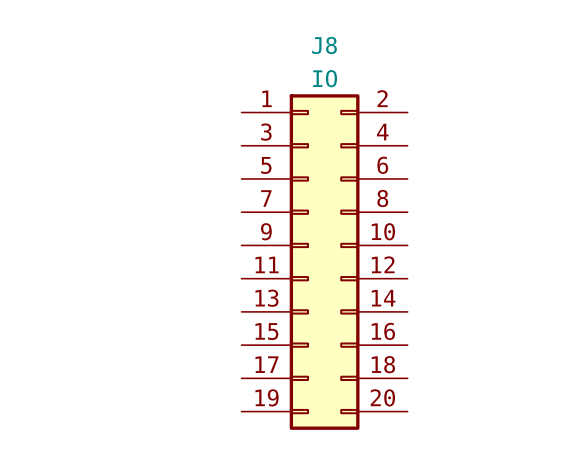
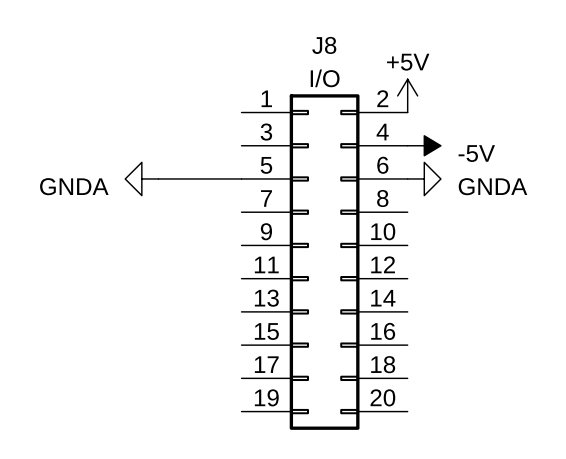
J8 value: IO (325, 78) -> I/O (325, 78)
power symbol: none -> +5V (407, 95)
power symbol: none -> -5V (424, 145)
power symbol: none -> GNDA (141, 178)
wire: none -> (158, 178) (241, 178)
power symbol: none -> GNDA (424, 178)

